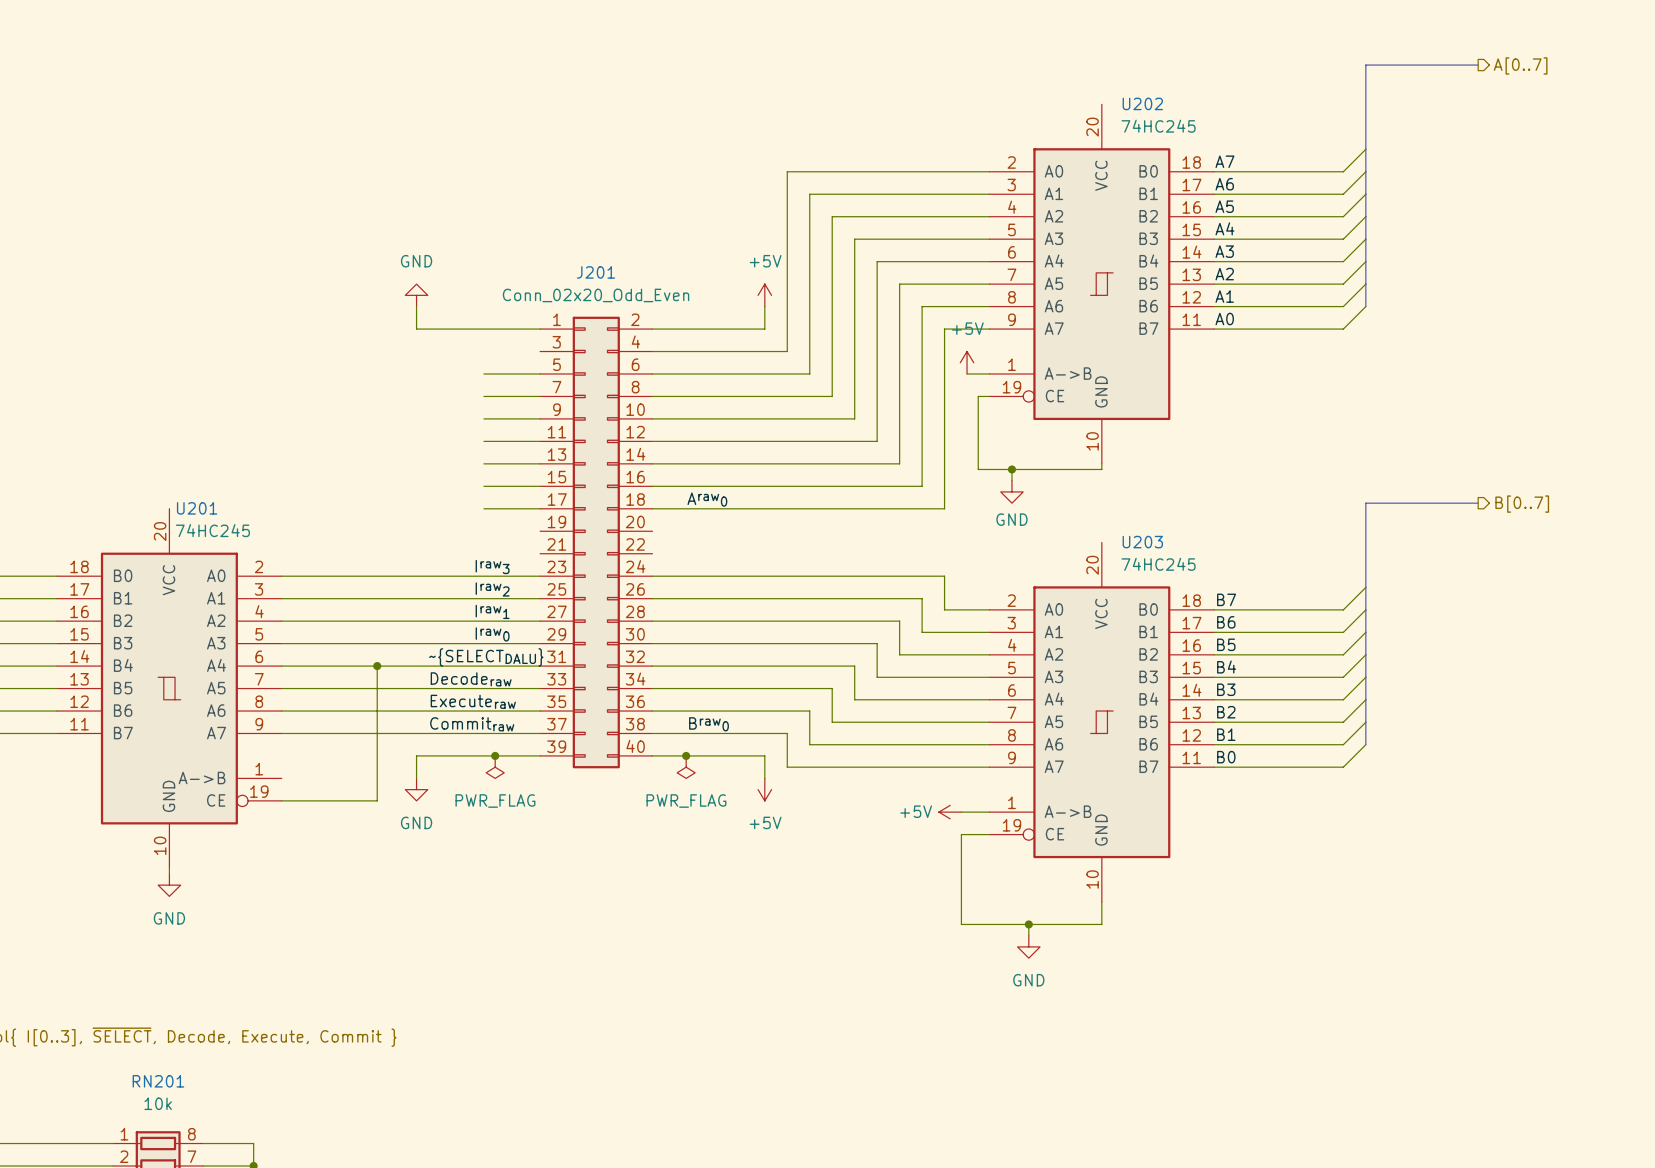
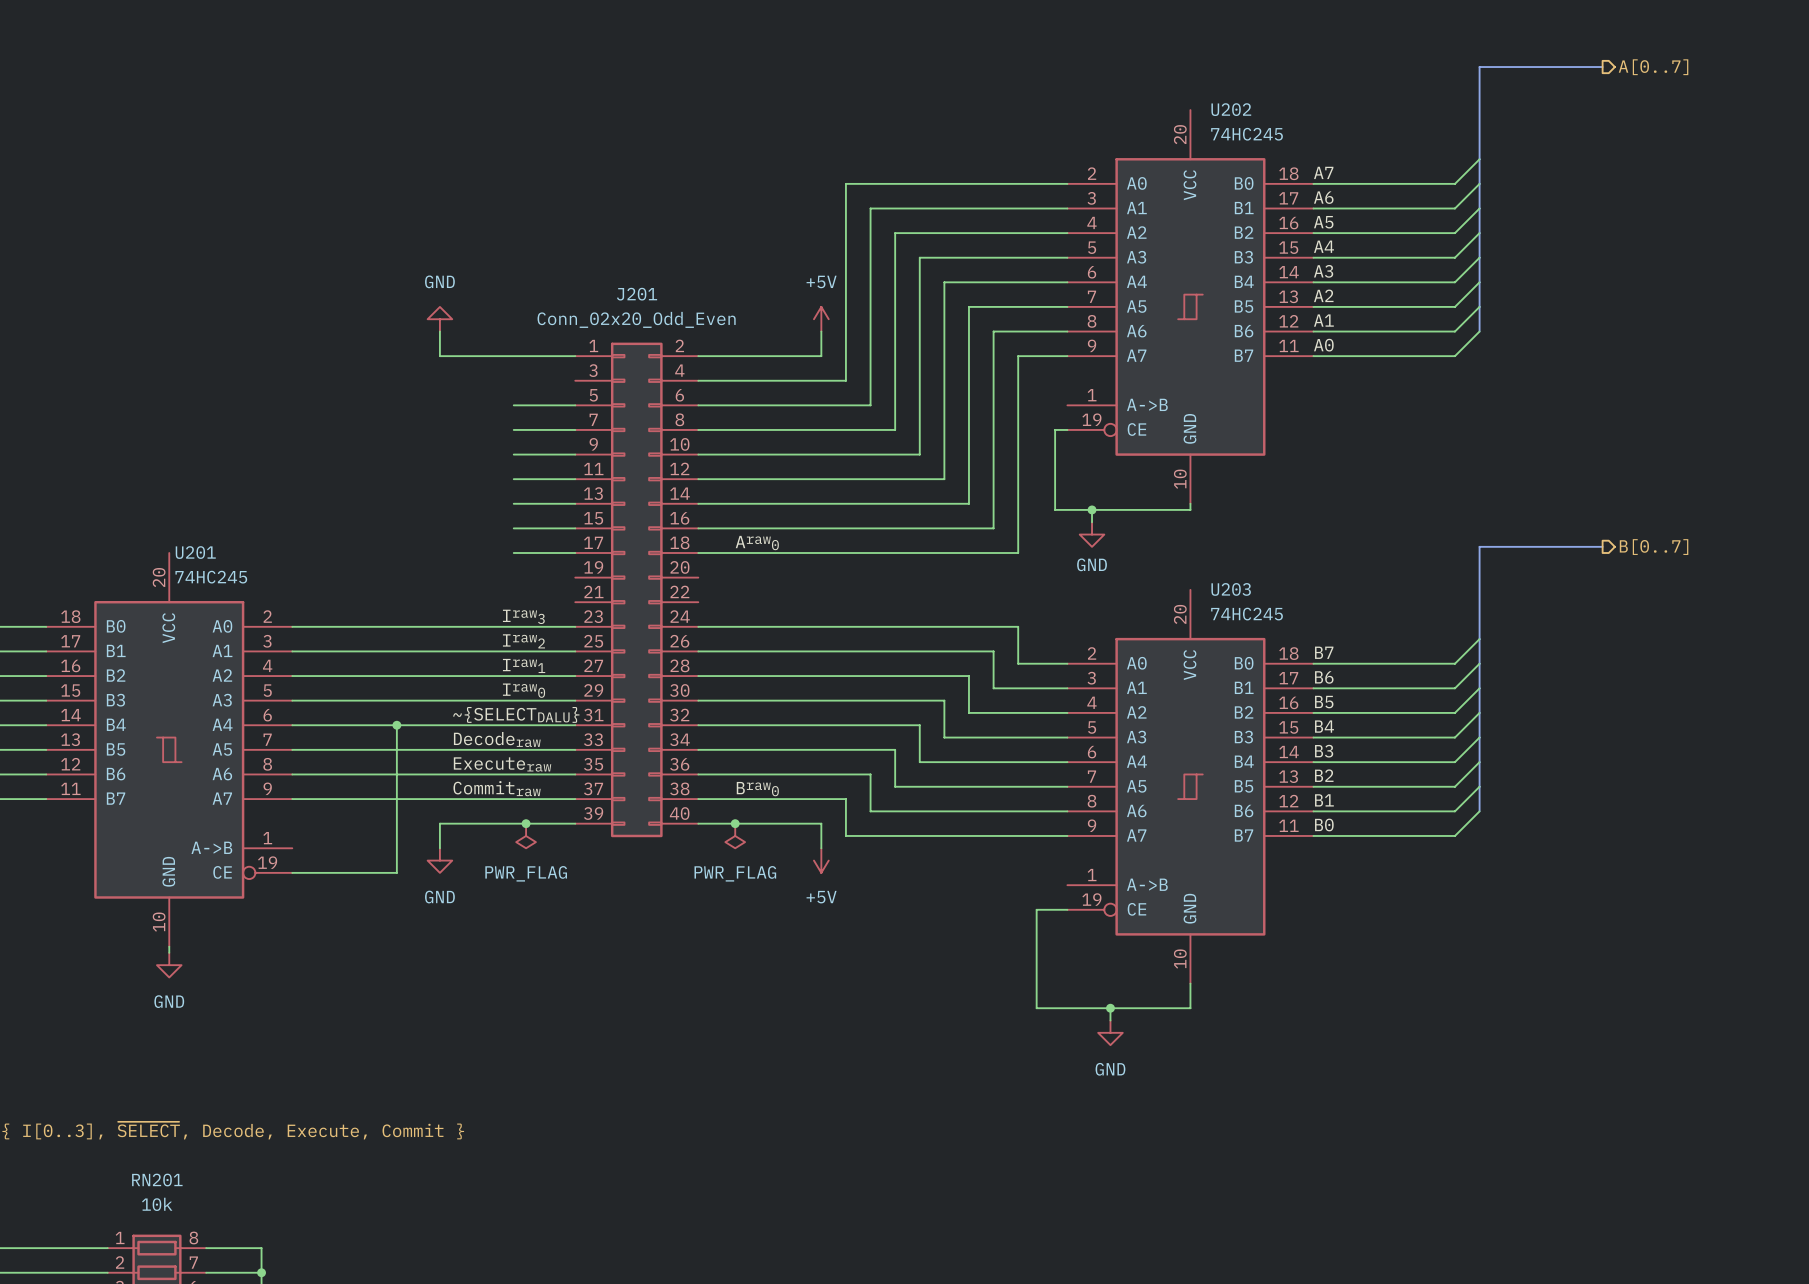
power symbol: +5V (967, 362) -> none
wire: (967, 373) (989, 373) -> none
power symbol: +5V (950, 812) -> none
wire: (961, 812) (989, 812) -> none

